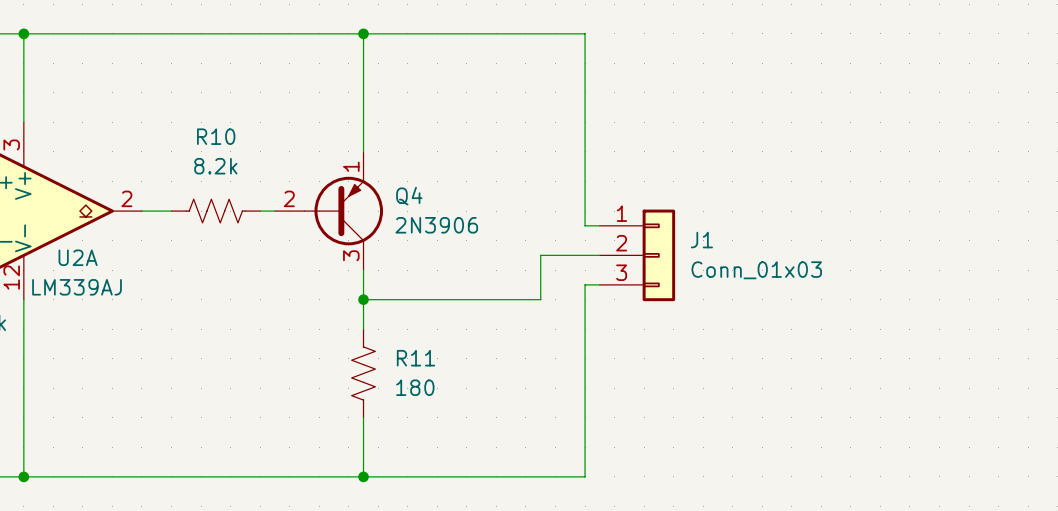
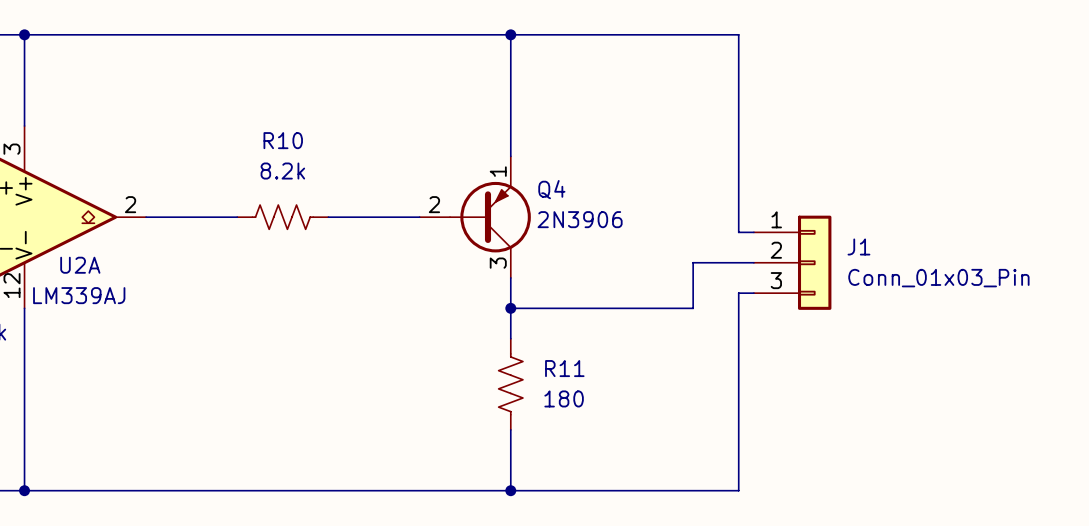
wire: (363, 33) (363, 151) -> (510, 34) (510, 156)
junction: (363, 33) -> none
junction: none -> (510, 34)
wire: (585, 33) (585, 225) (599, 225) -> (601, 34) (738, 34) (738, 232) (753, 232)
Q4 name position: Q4 (409, 196) -> Q4 (551, 189)
wire: none -> (176, 217) (237, 217)
R10 position: (215, 211) -> (282, 217)
wire: (260, 211) (274, 211) -> none
wire: none -> (328, 217) (419, 217)
Q4 position: (328, 211) -> (475, 217)
Q4 value position: 2N3906 (436, 225) -> 2N3906 (580, 219)
wire: (599, 255) (540, 255) (540, 299) -> (753, 262) (693, 262) (693, 308) (556, 308)
J1 position: (637, 255) -> (792, 262)
wire: (363, 270) (363, 329) -> (510, 277) (510, 338)
J1 value: Conn_01x03 (756, 270) -> Conn_01x03_Pin (938, 278)
wire: (599, 284) (585, 284) (585, 476) -> (753, 293) (738, 293) (738, 490) (601, 490)
wire: (363, 299) (496, 299) -> none
junction: (363, 299) -> none
junction: none -> (510, 308)
R11 position: (363, 373) -> (510, 384)
wire: (363, 417) (363, 476) -> (510, 429) (510, 490)
junction: (363, 476) -> none
junction: none -> (510, 490)

